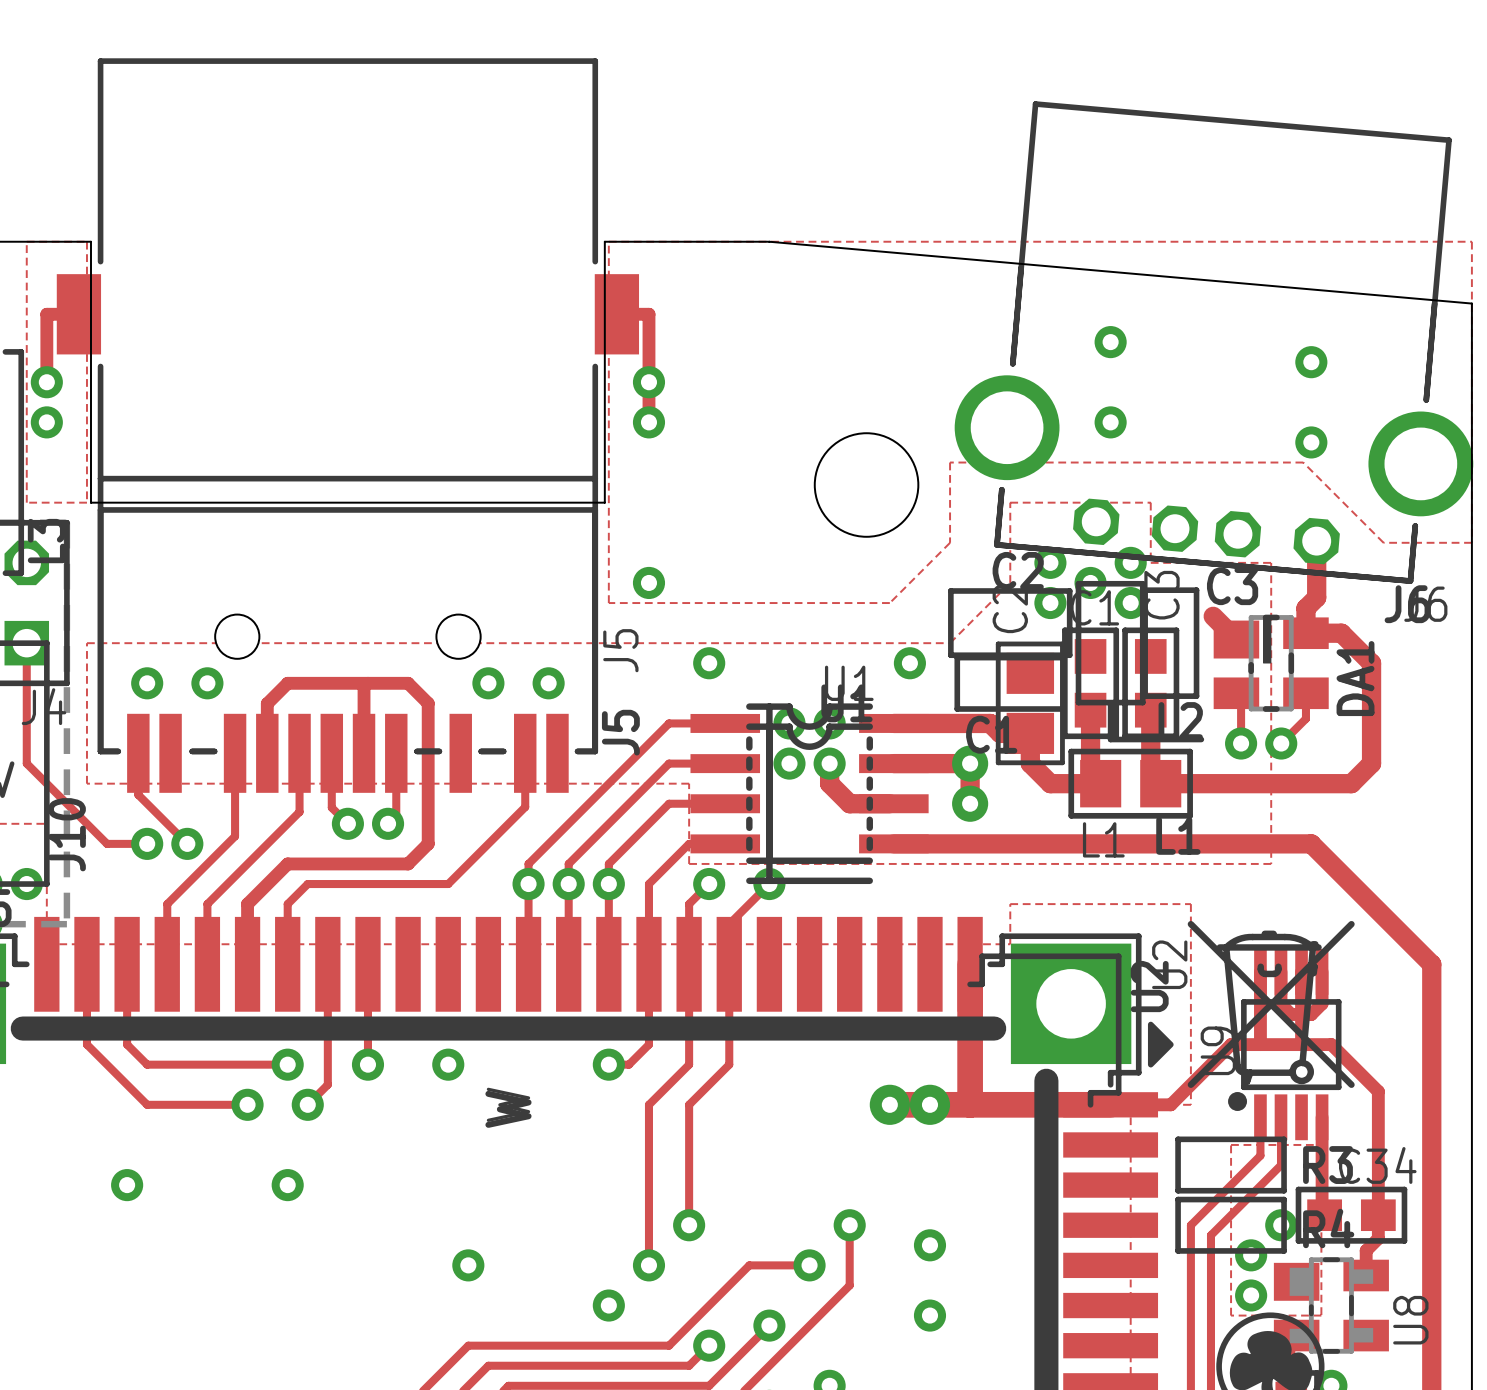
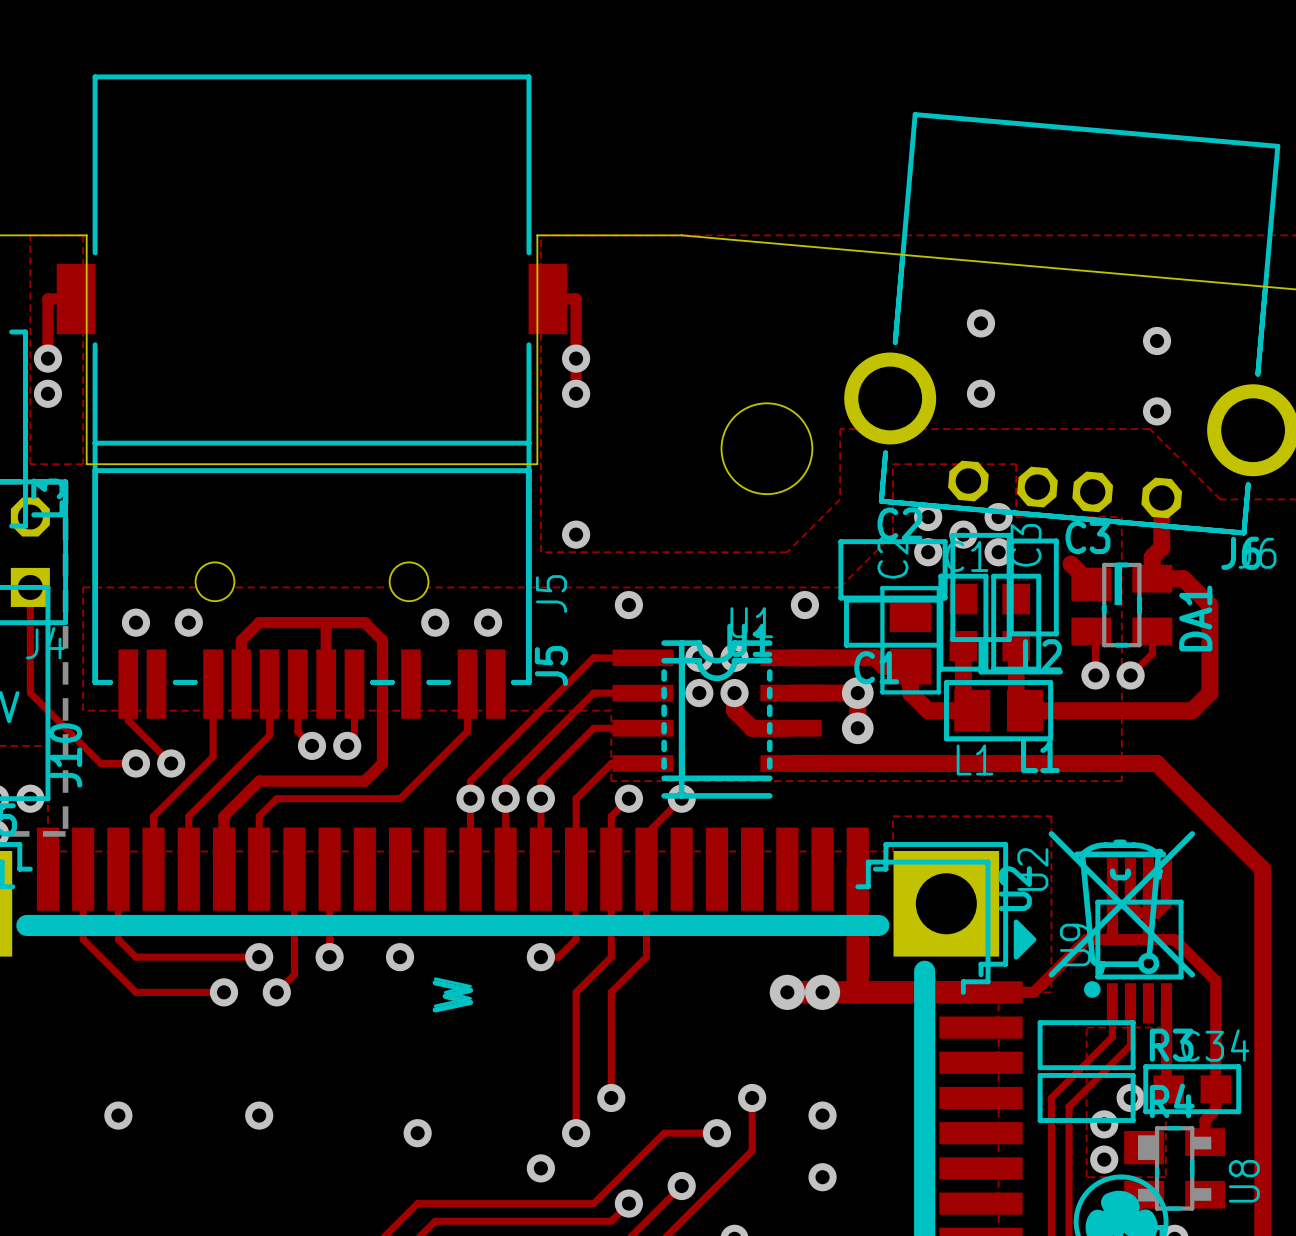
via position: (127, 1185) -> (118, 1115)
via position: (287, 1185) -> (259, 1115)

